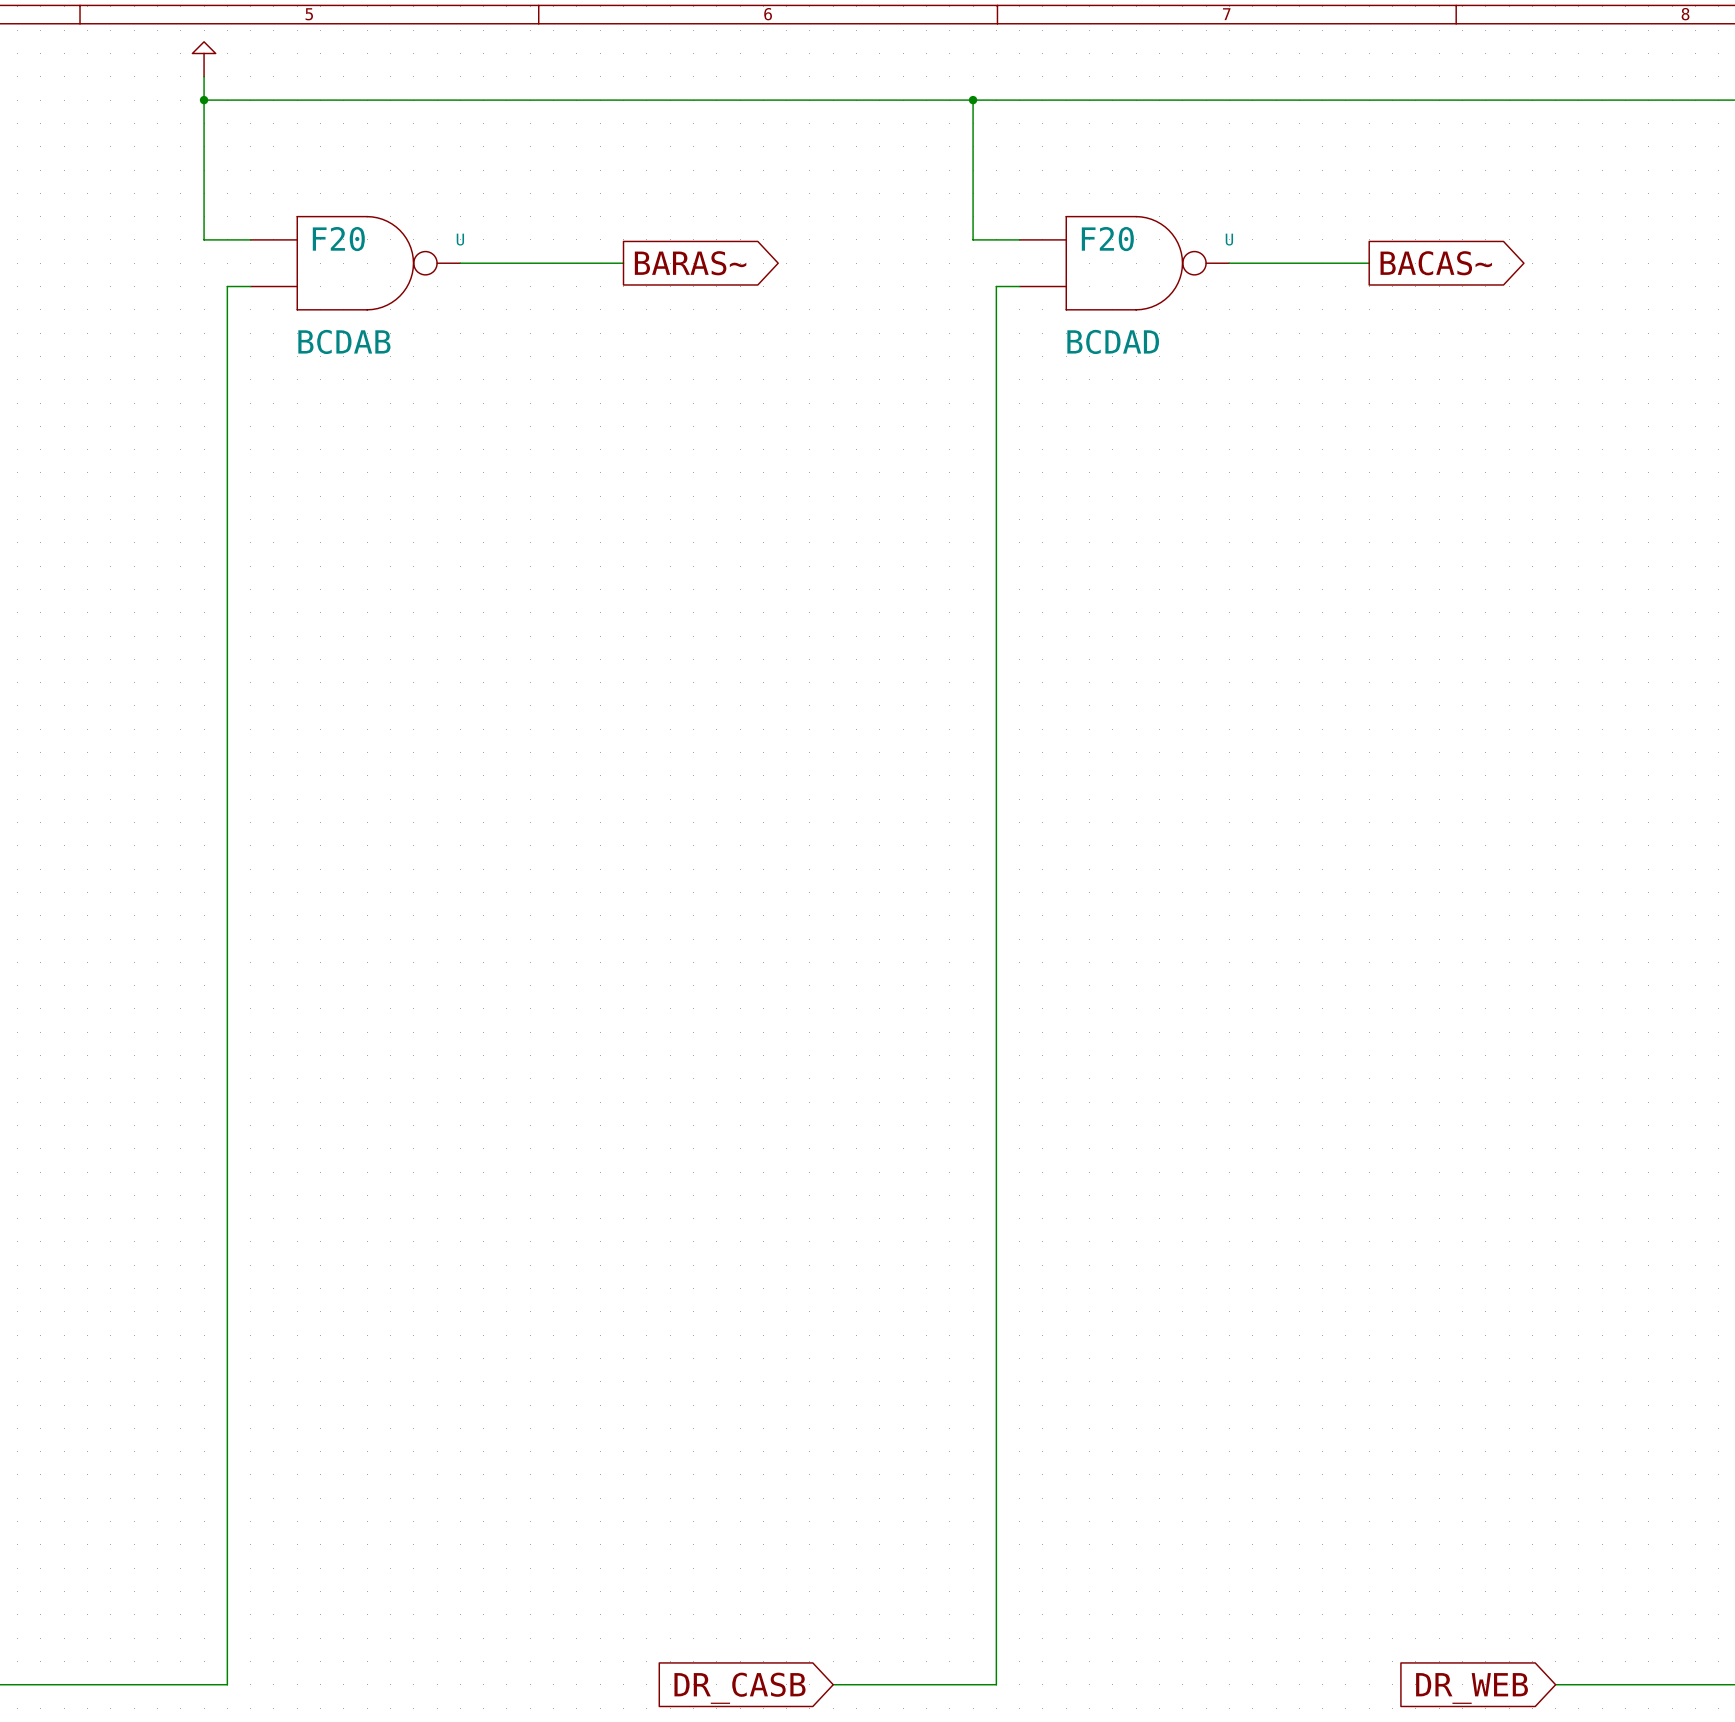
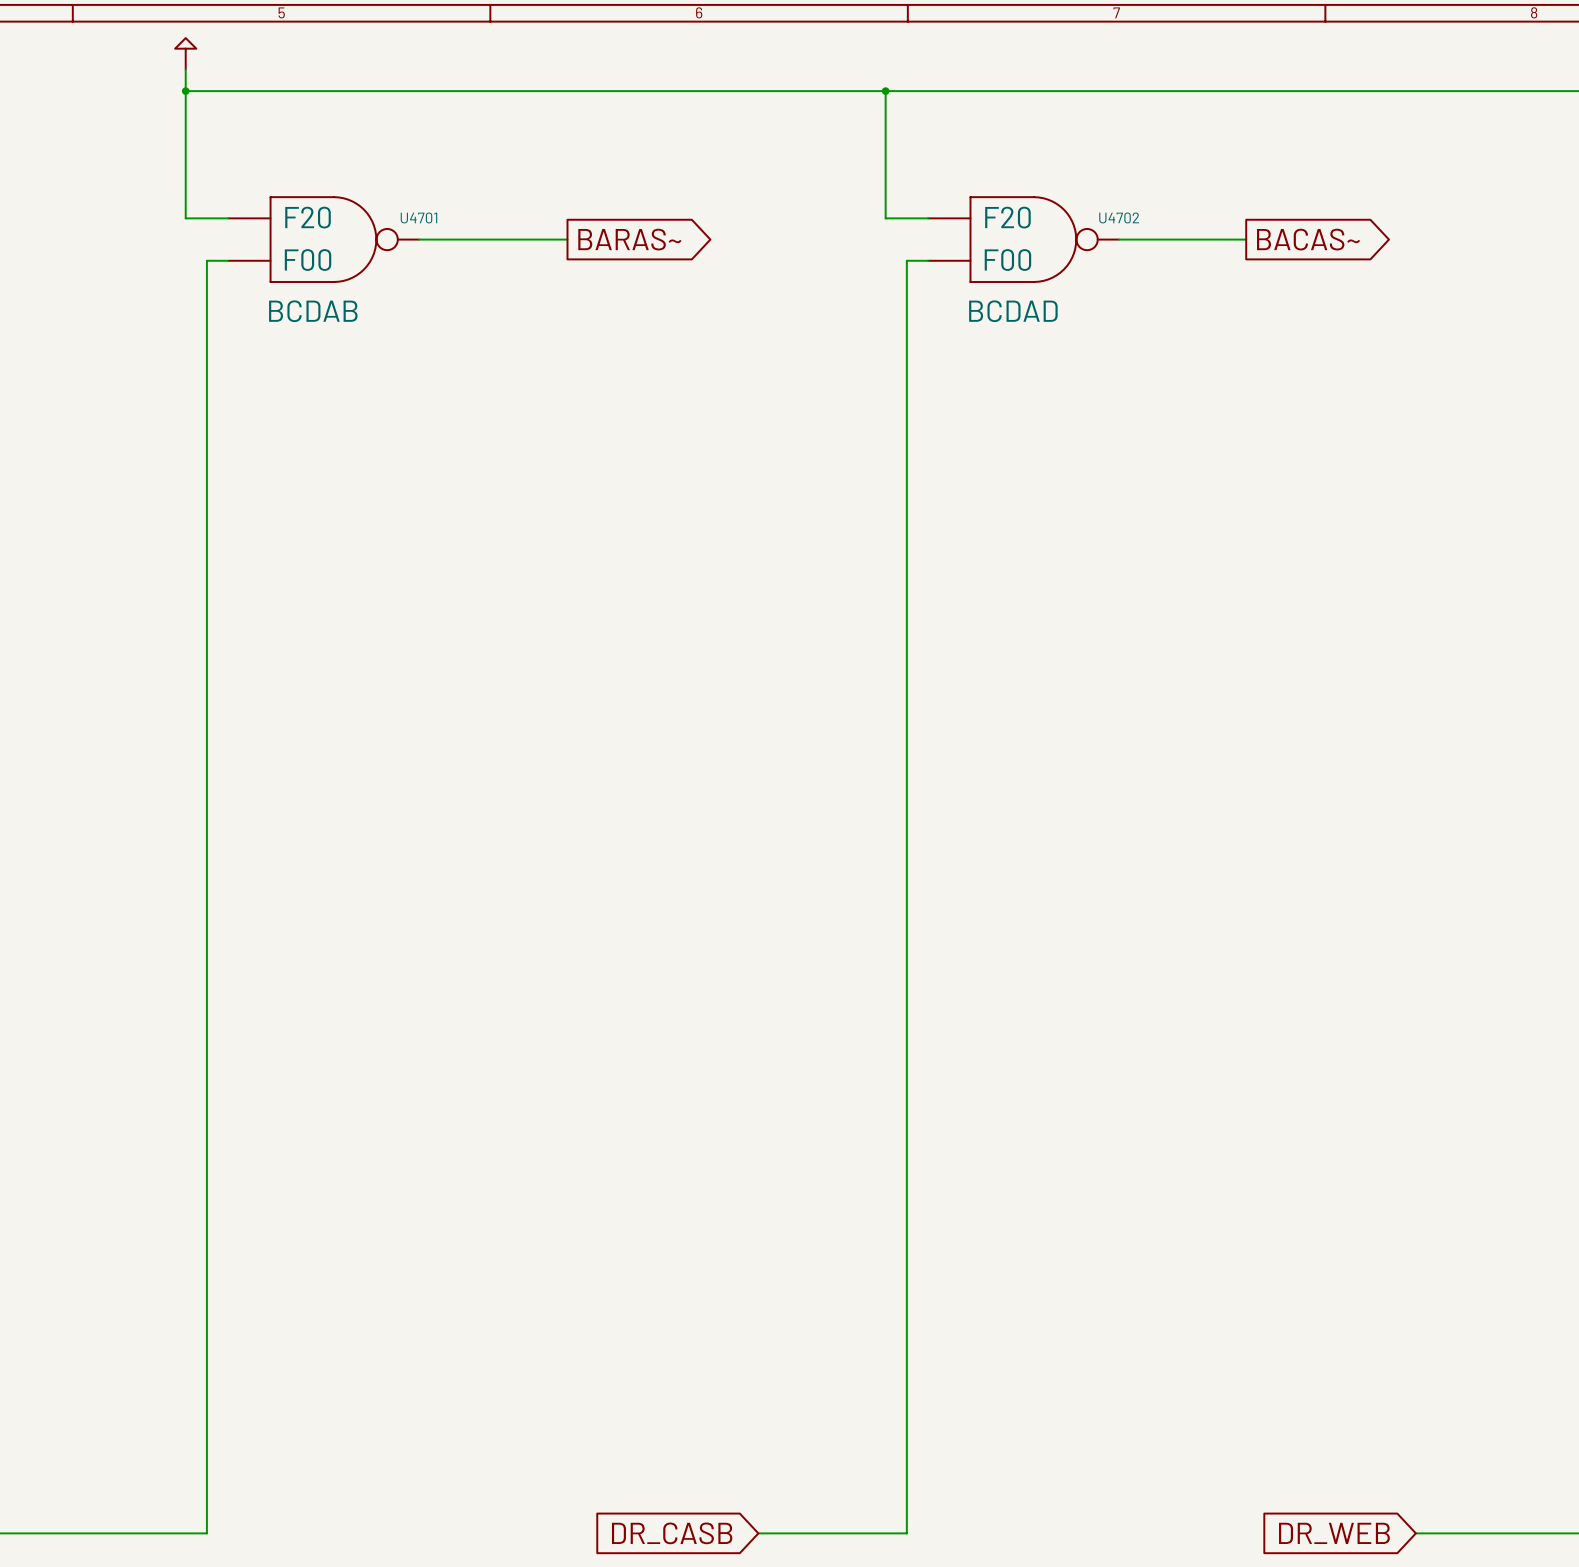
U name: U (460, 239) -> U4701 (418, 217)
U name: U (1229, 239) -> U4702 (1119, 217)
U value: none -> F00 (308, 260)
U value: none -> F00 (1007, 260)

